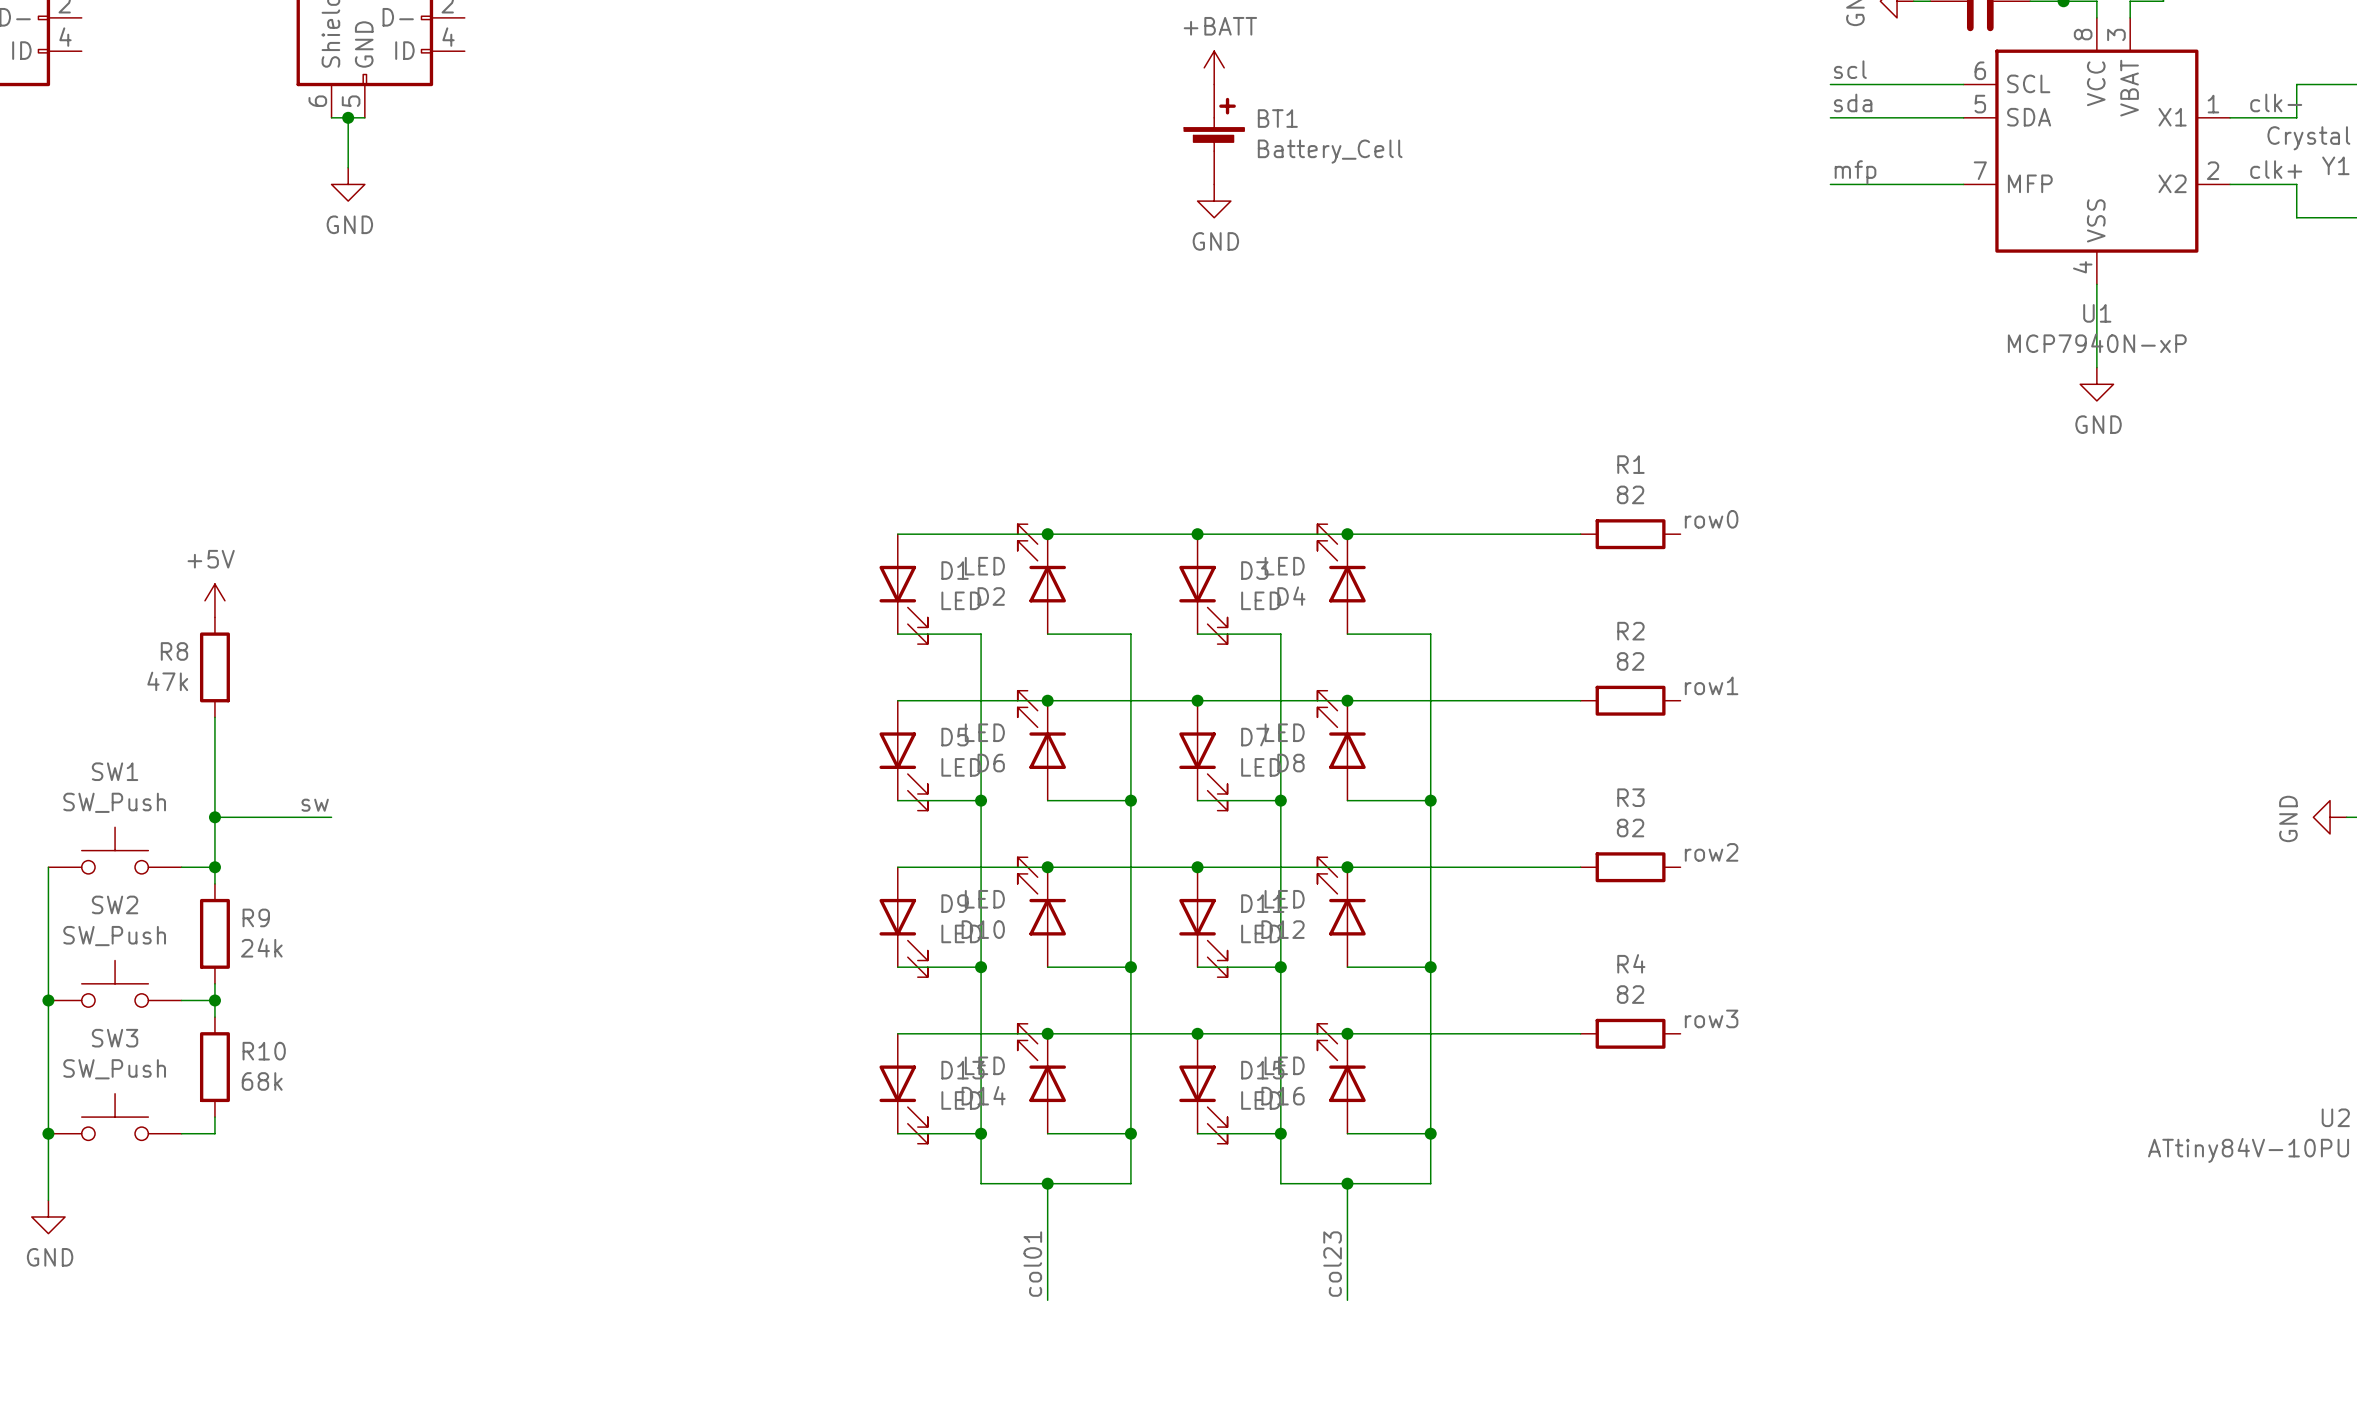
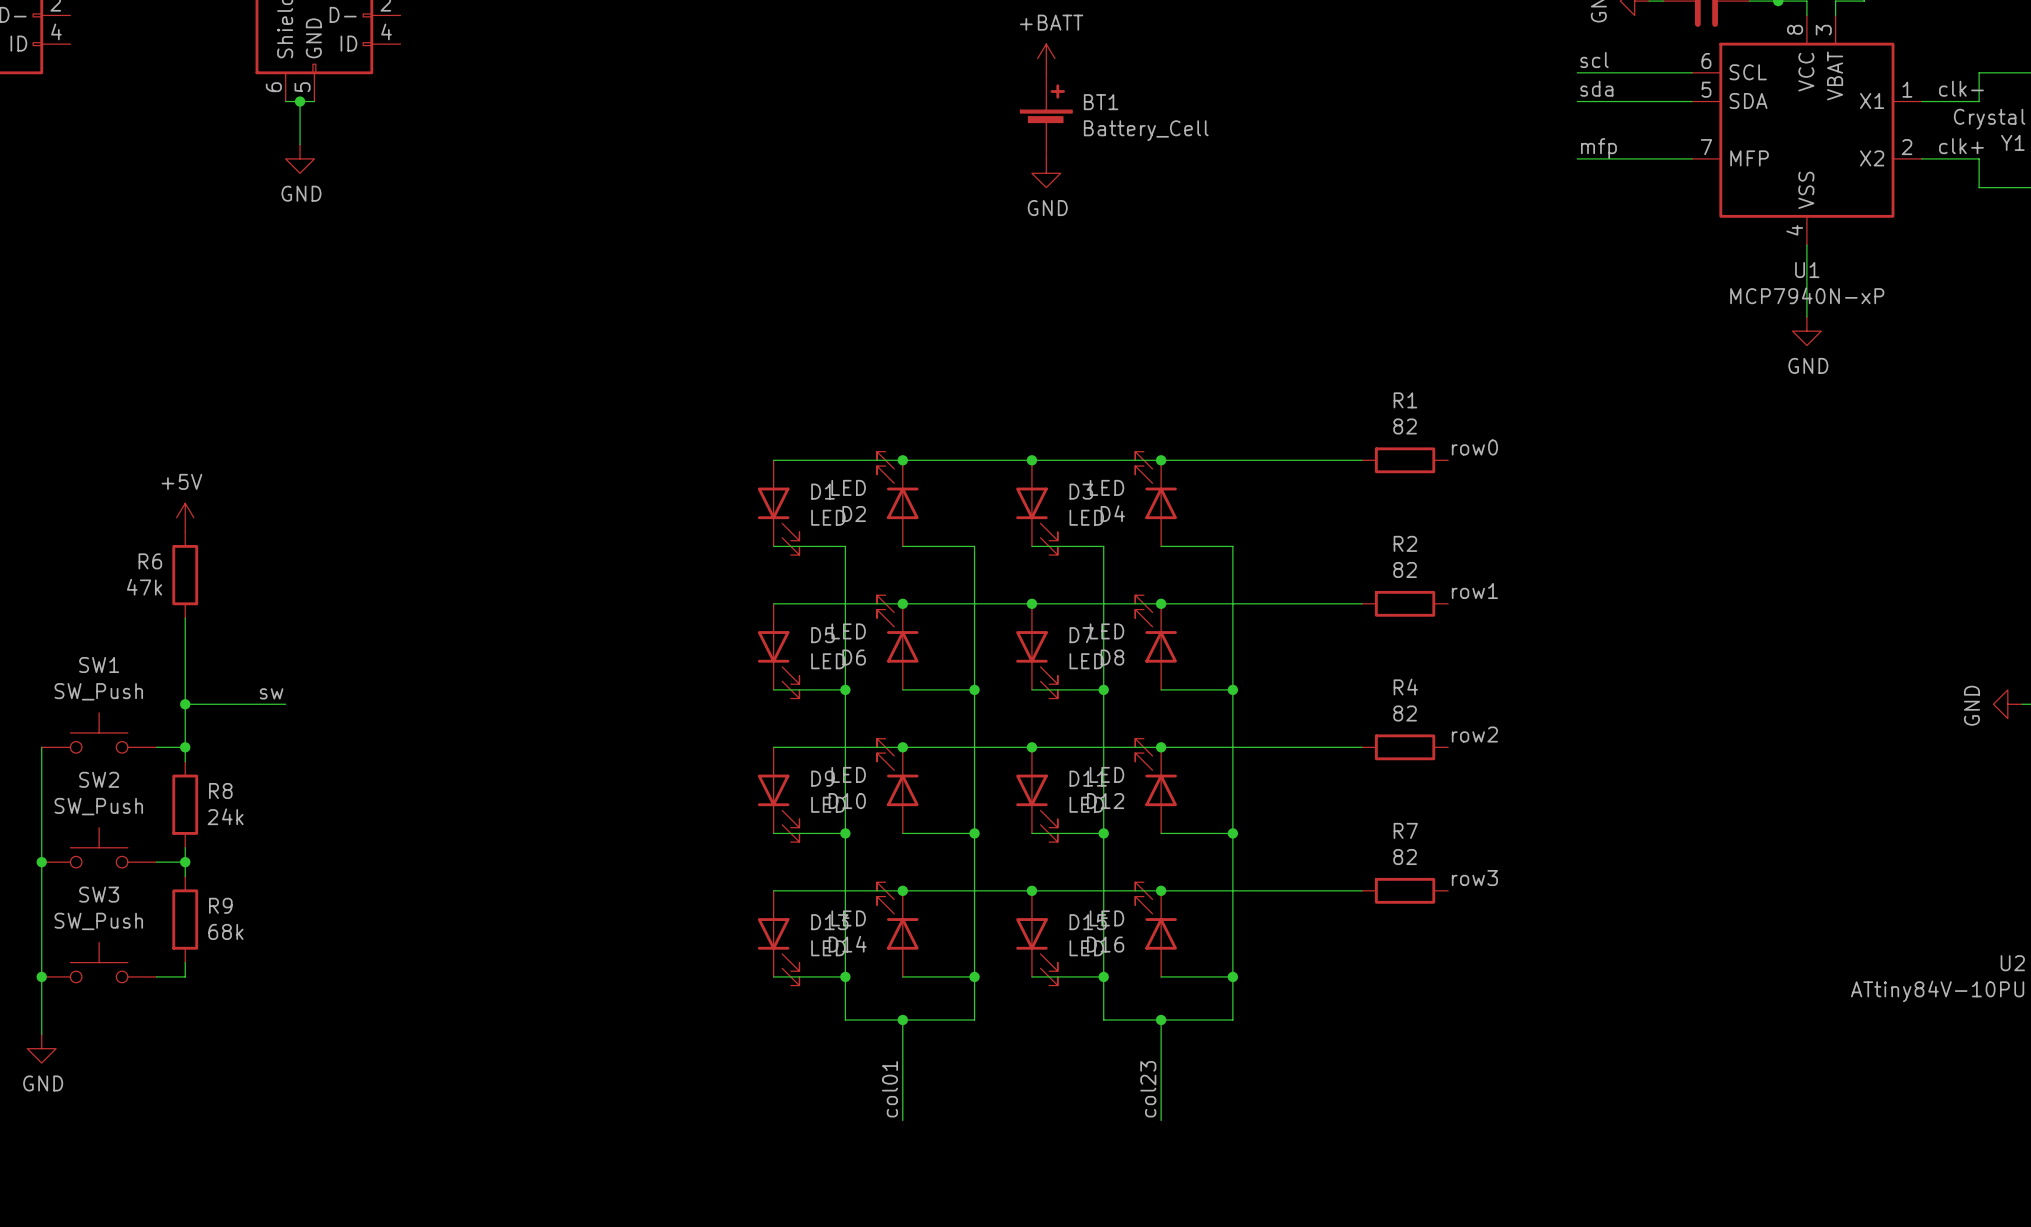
R8 name: R8 (174, 651) -> R6 (150, 561)
R3 name: R3 (1630, 797) -> R4 (1405, 687)
R9 name: R9 (256, 917) -> R8 (220, 790)
R4 name: R4 (1631, 963) -> R7 (1405, 830)
R10 name: R10 (264, 1051) -> R9 (220, 905)

